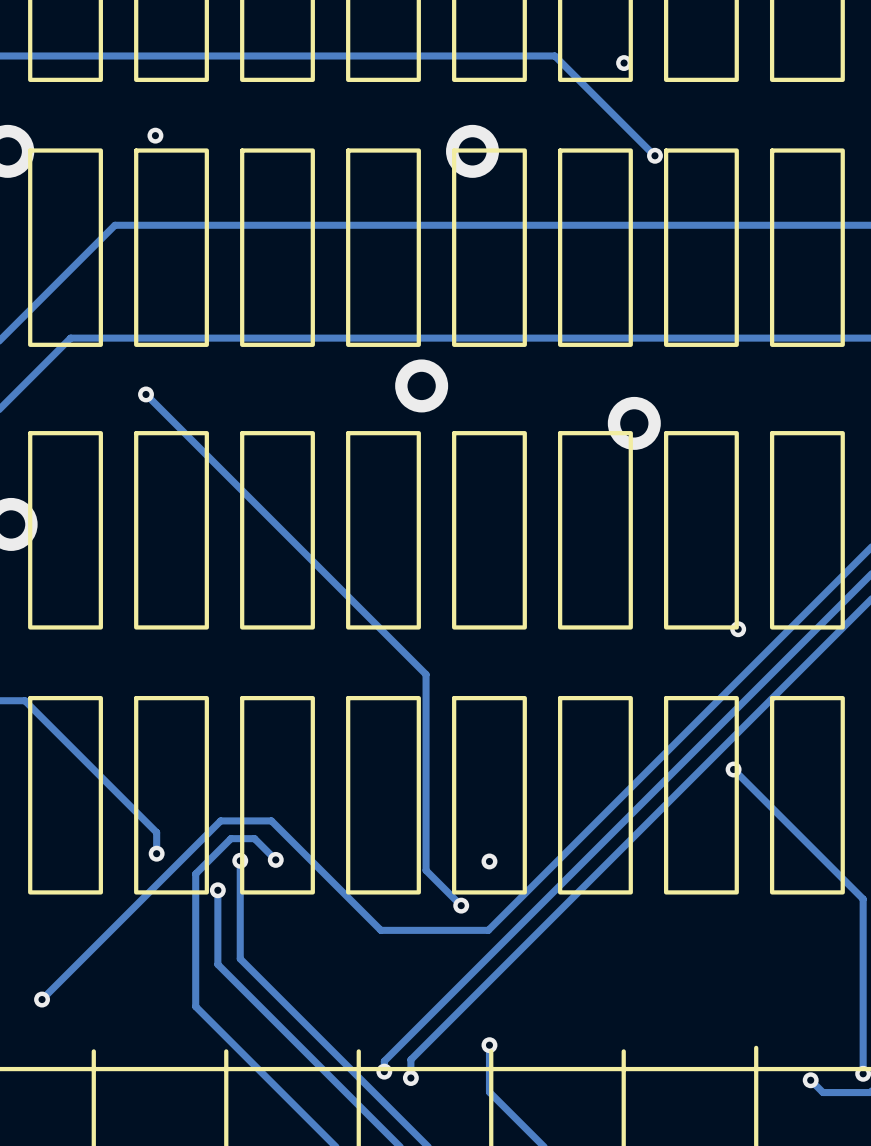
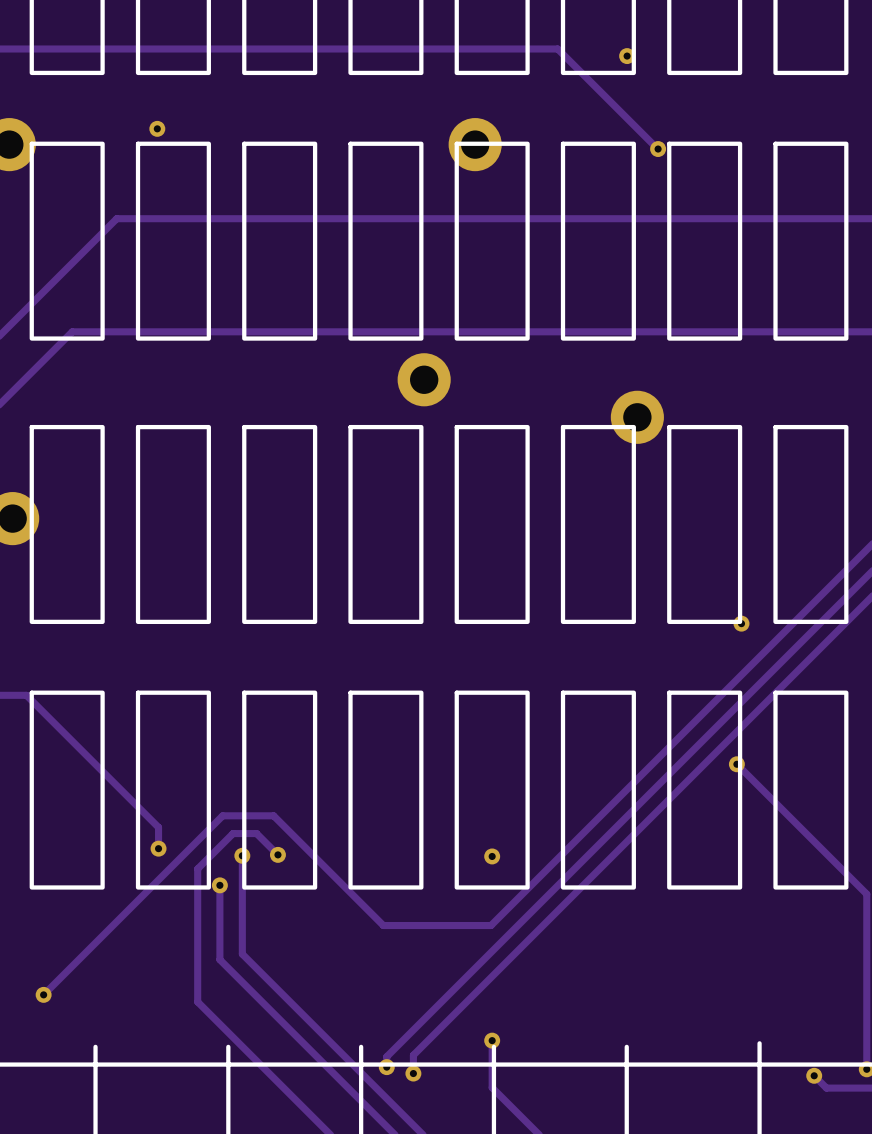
track: (146, 394) (426, 674) (426, 870) (461, 905) -> none
via: (146, 394) -> none
via: (461, 905) -> none

